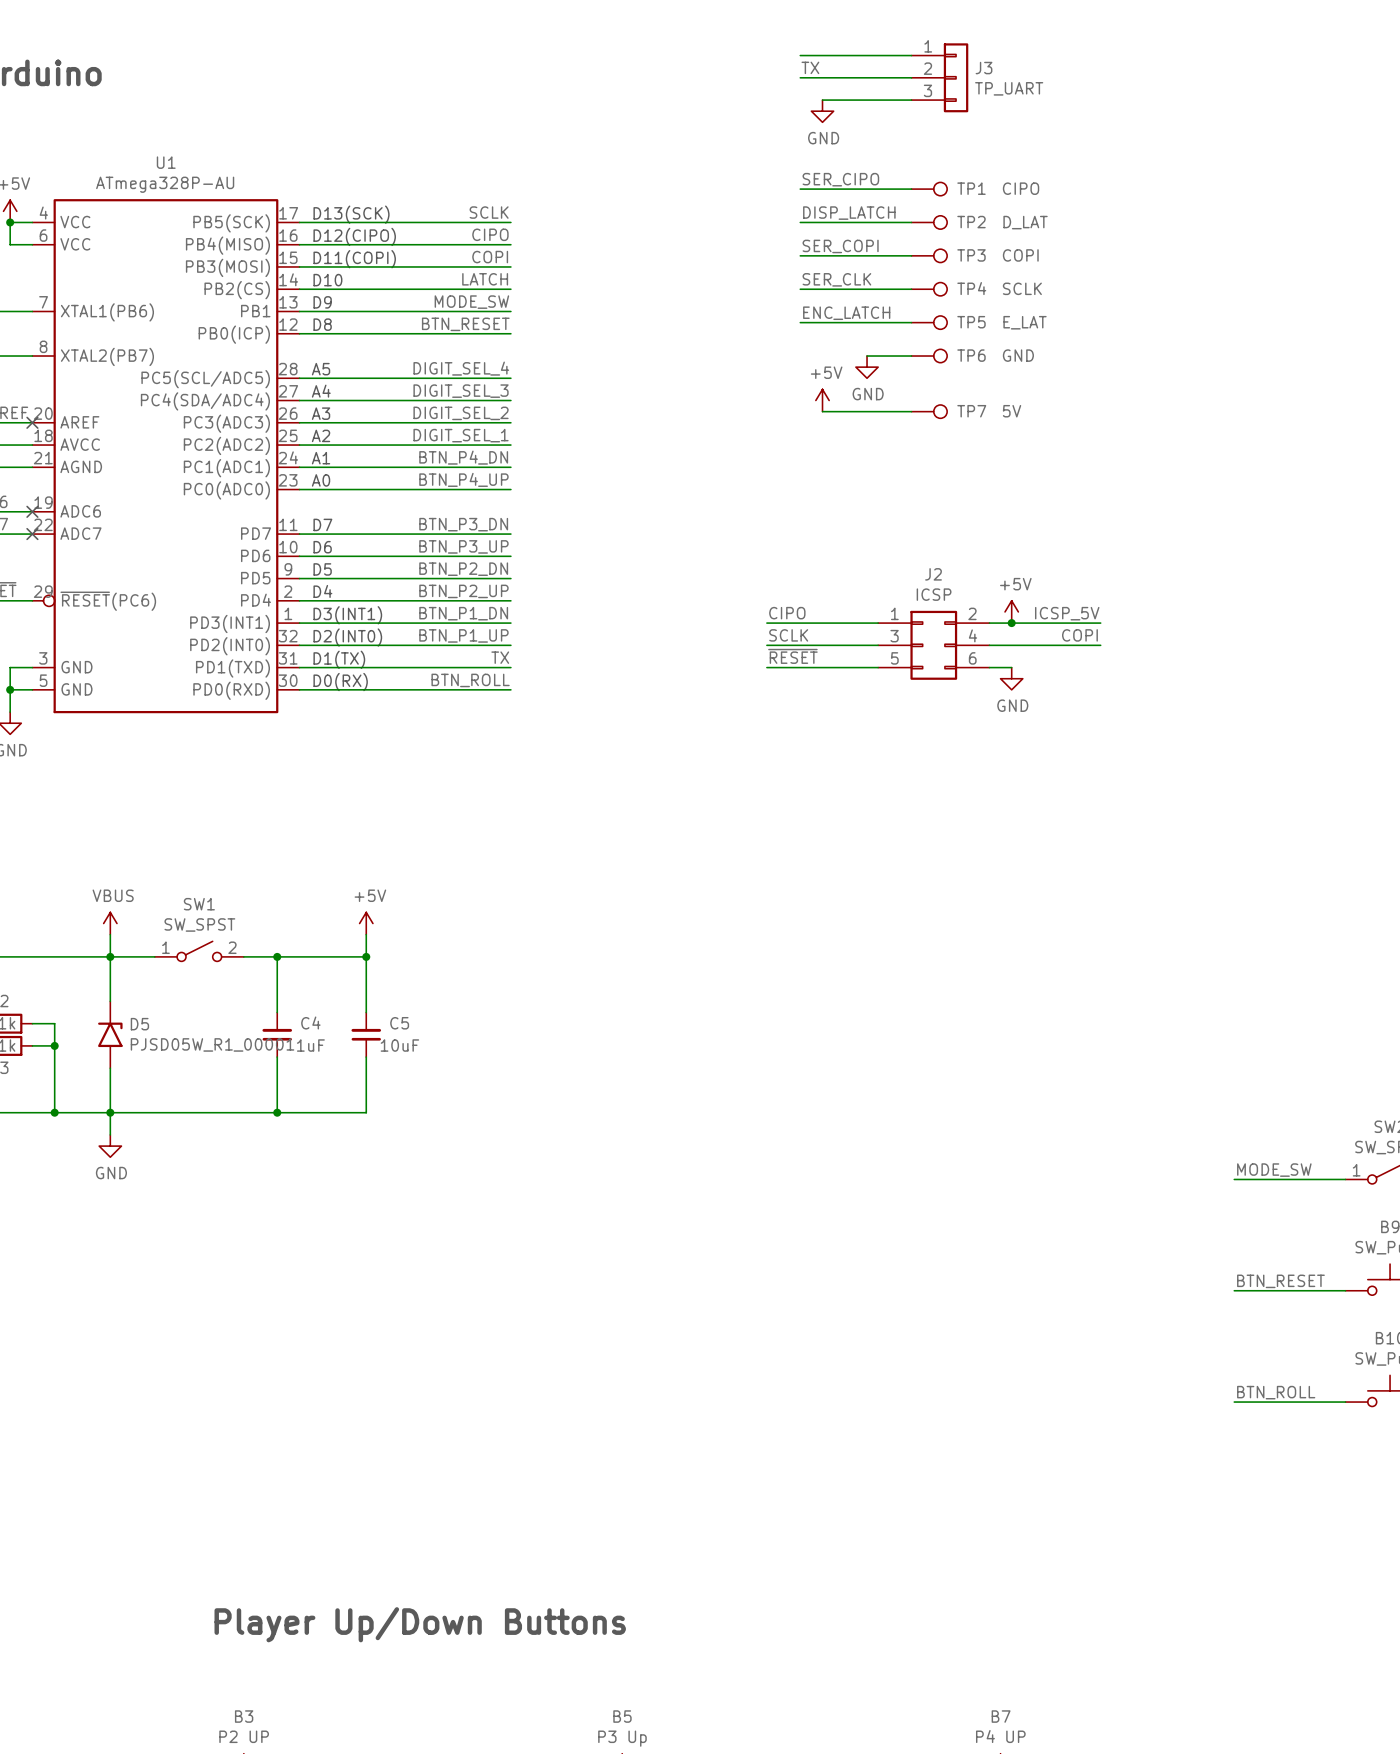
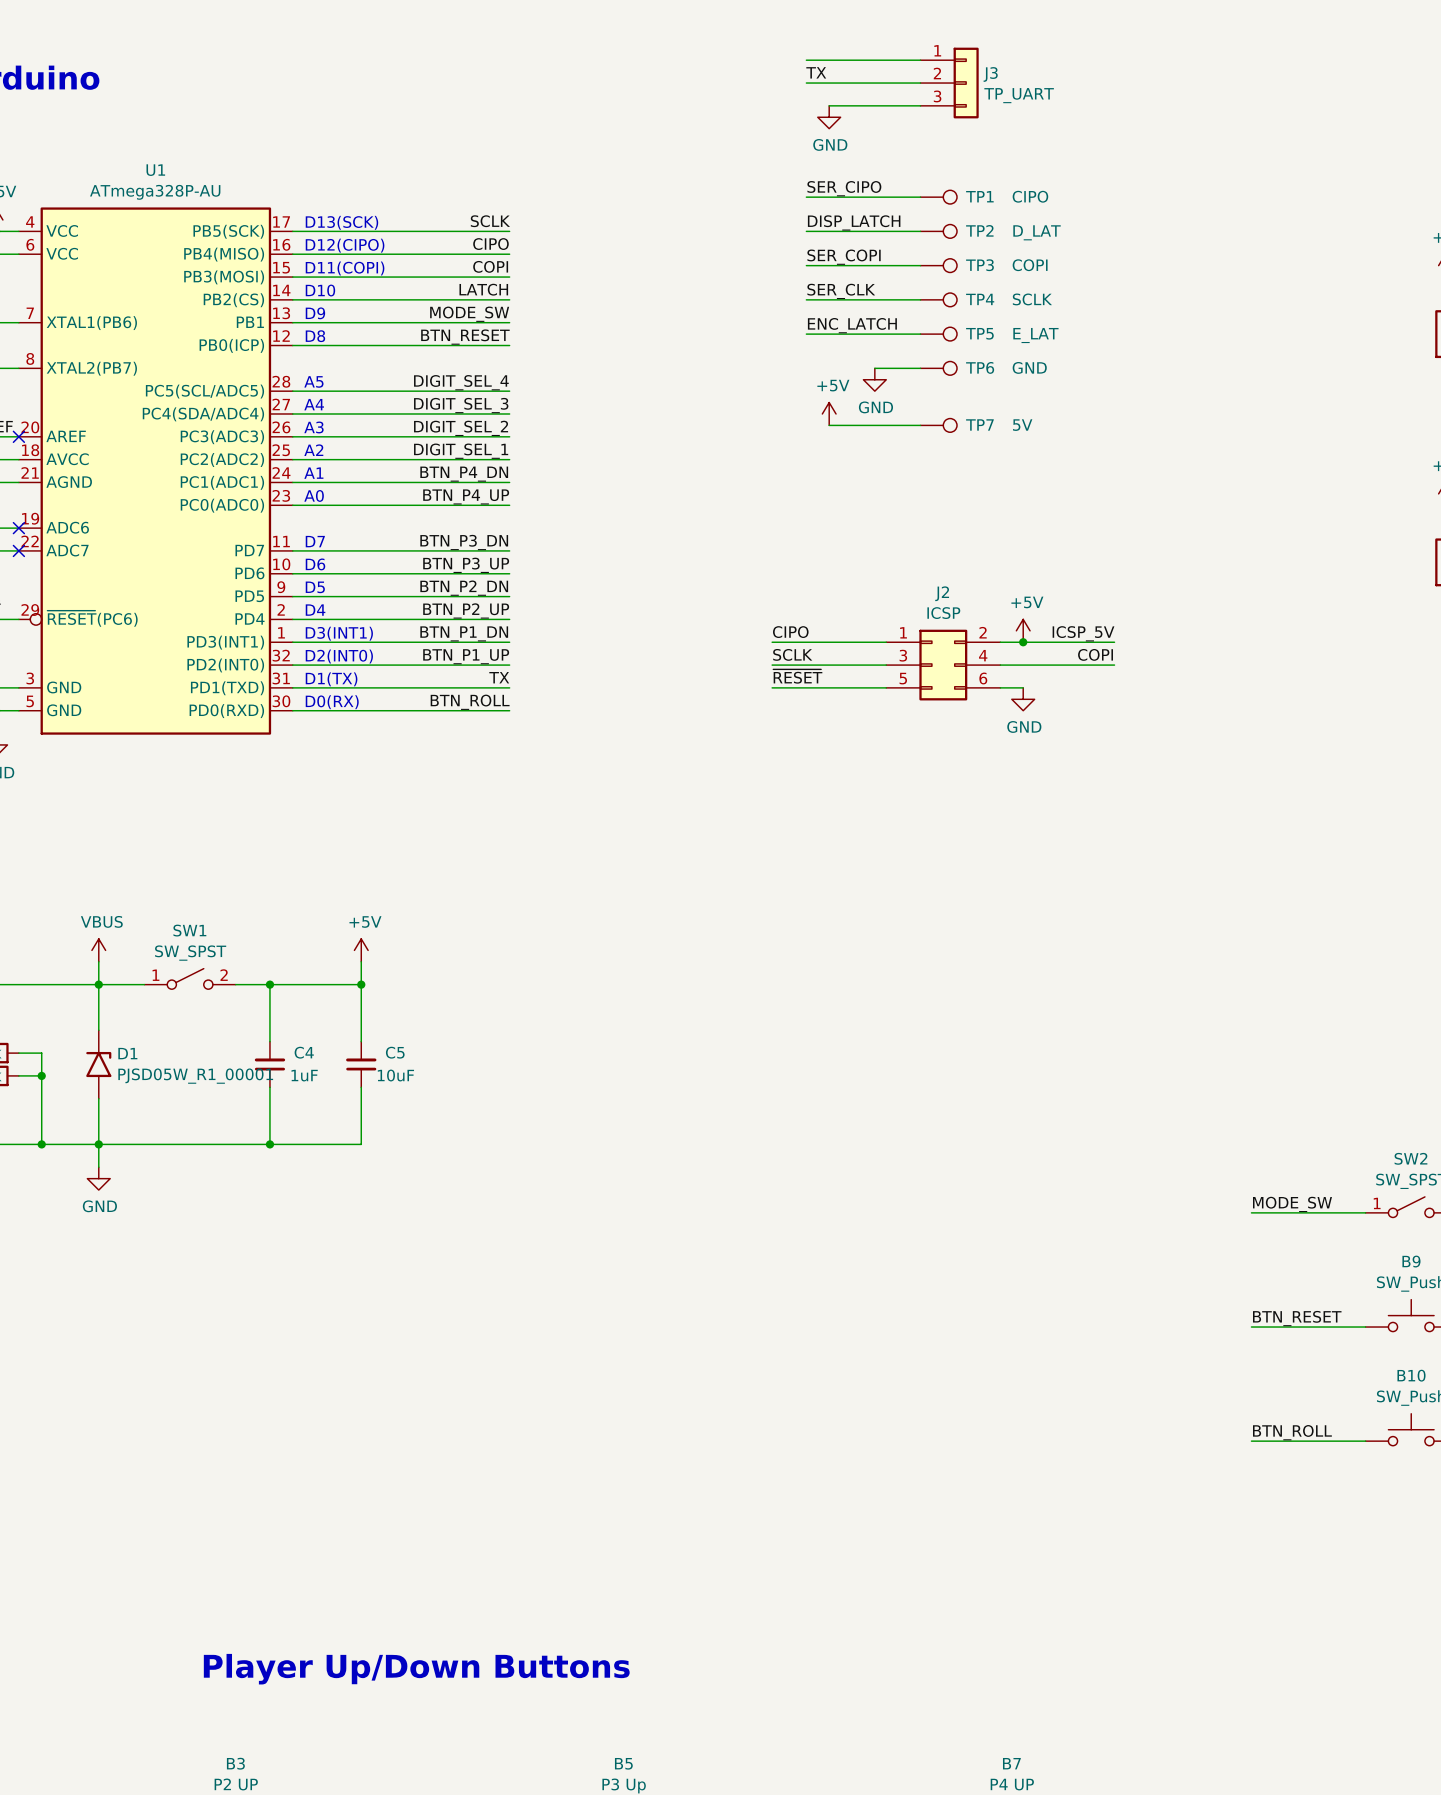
D5 name: D5 (139, 1024) -> D1 (127, 1053)

